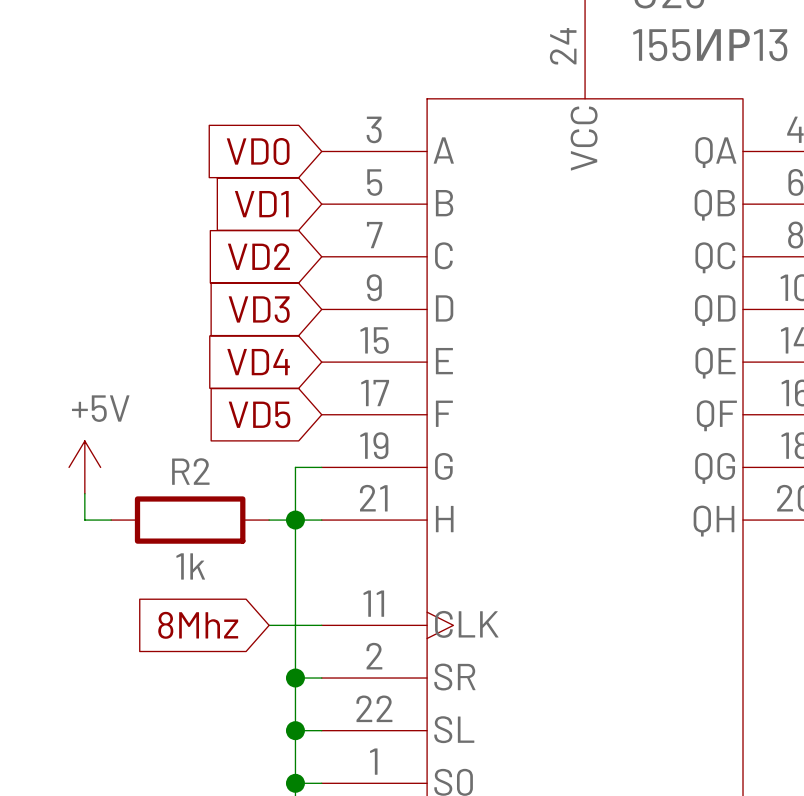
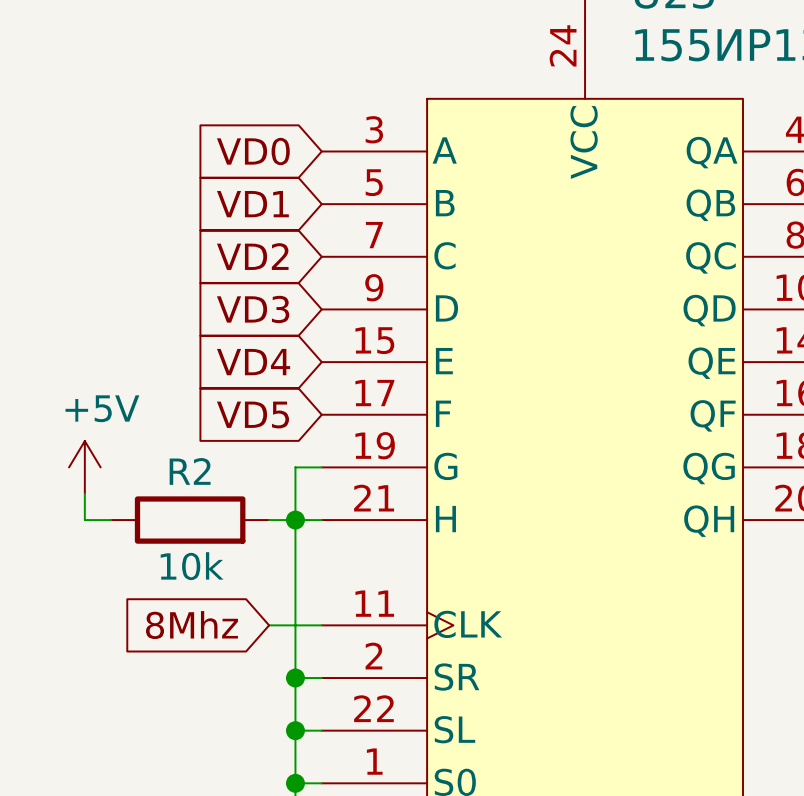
R2 value: 1k (190, 566) -> 10k (192, 566)

